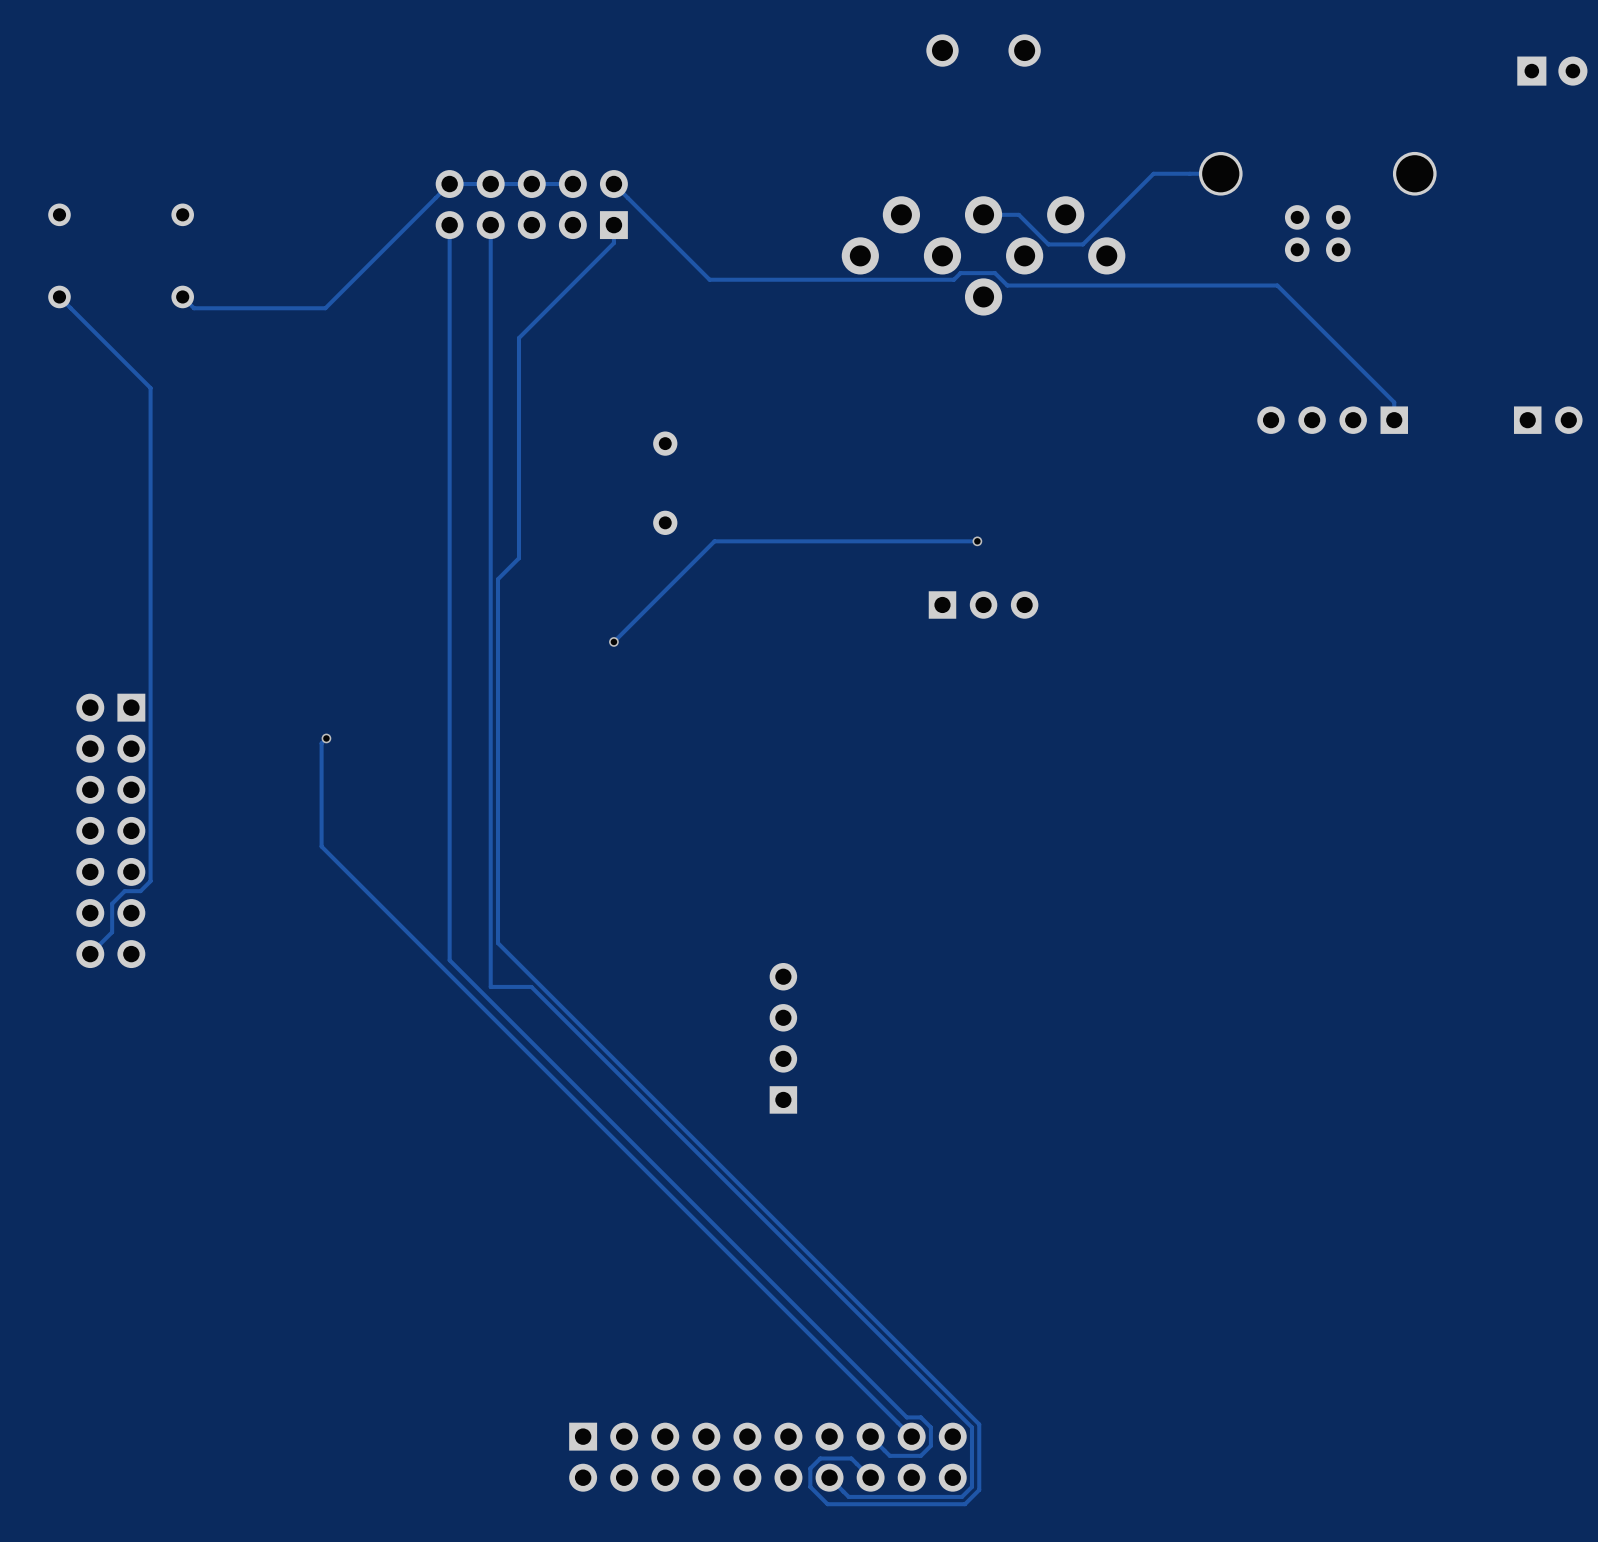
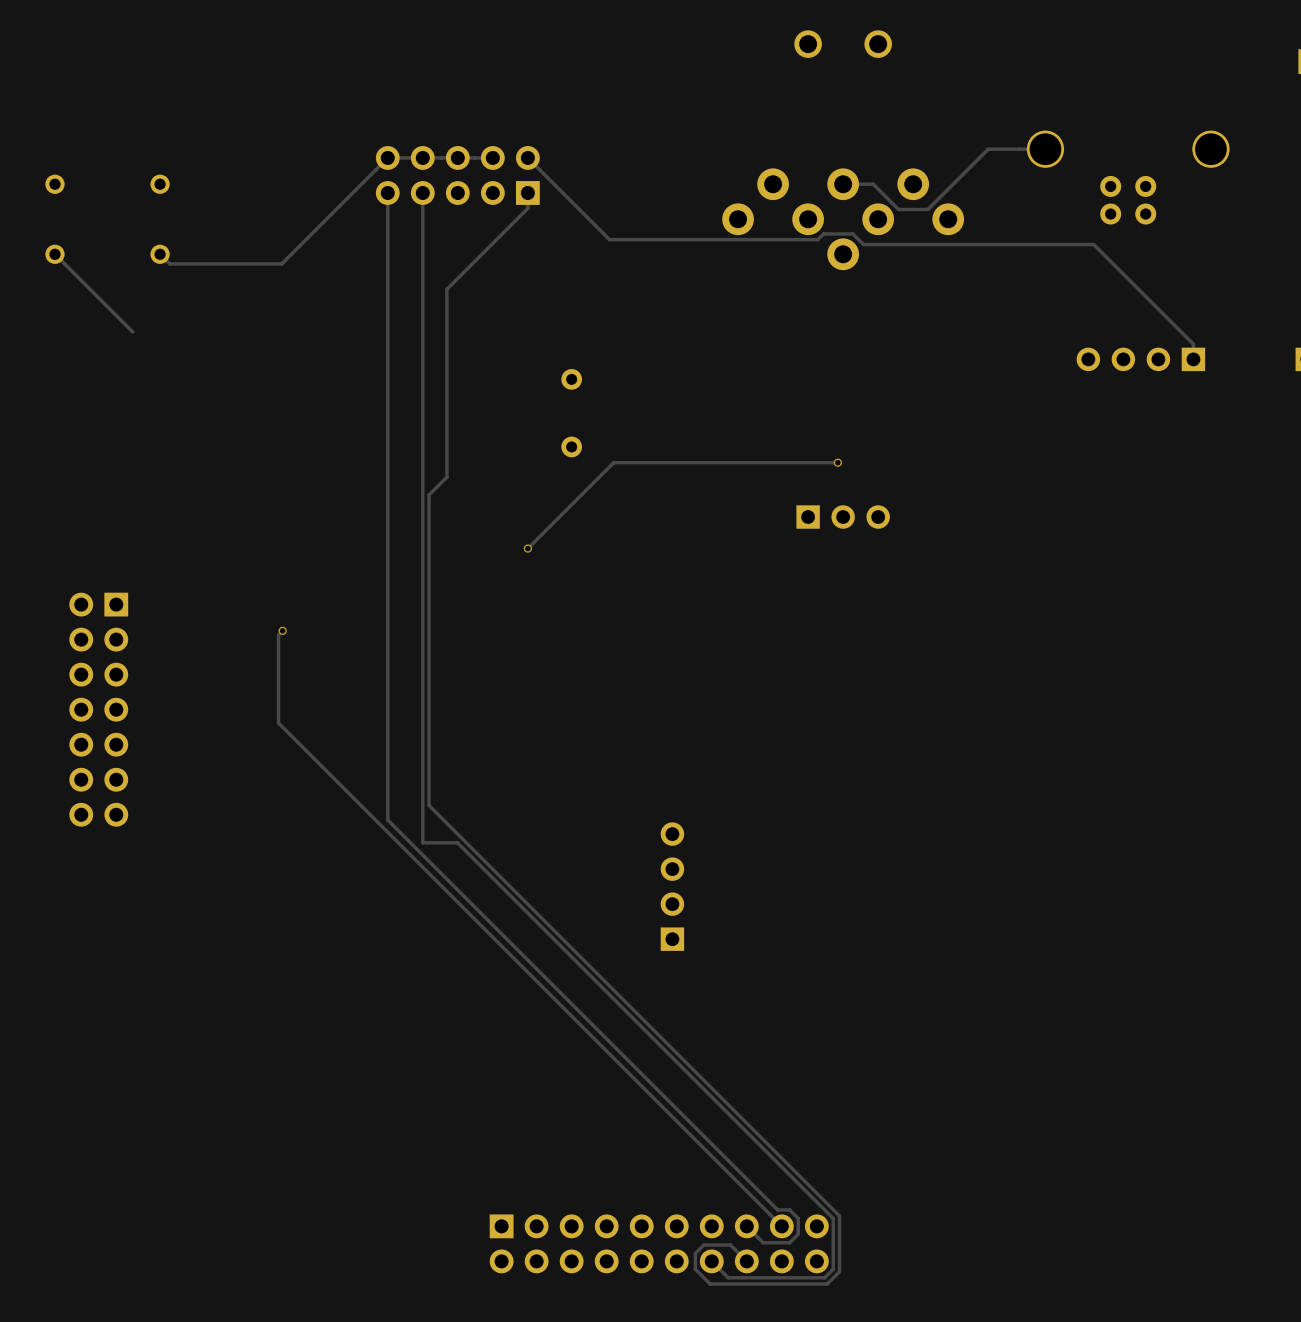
track: (150, 388) (150, 881) (140, 891) (124, 891) (112, 903) (112, 932) (90, 954) -> none

